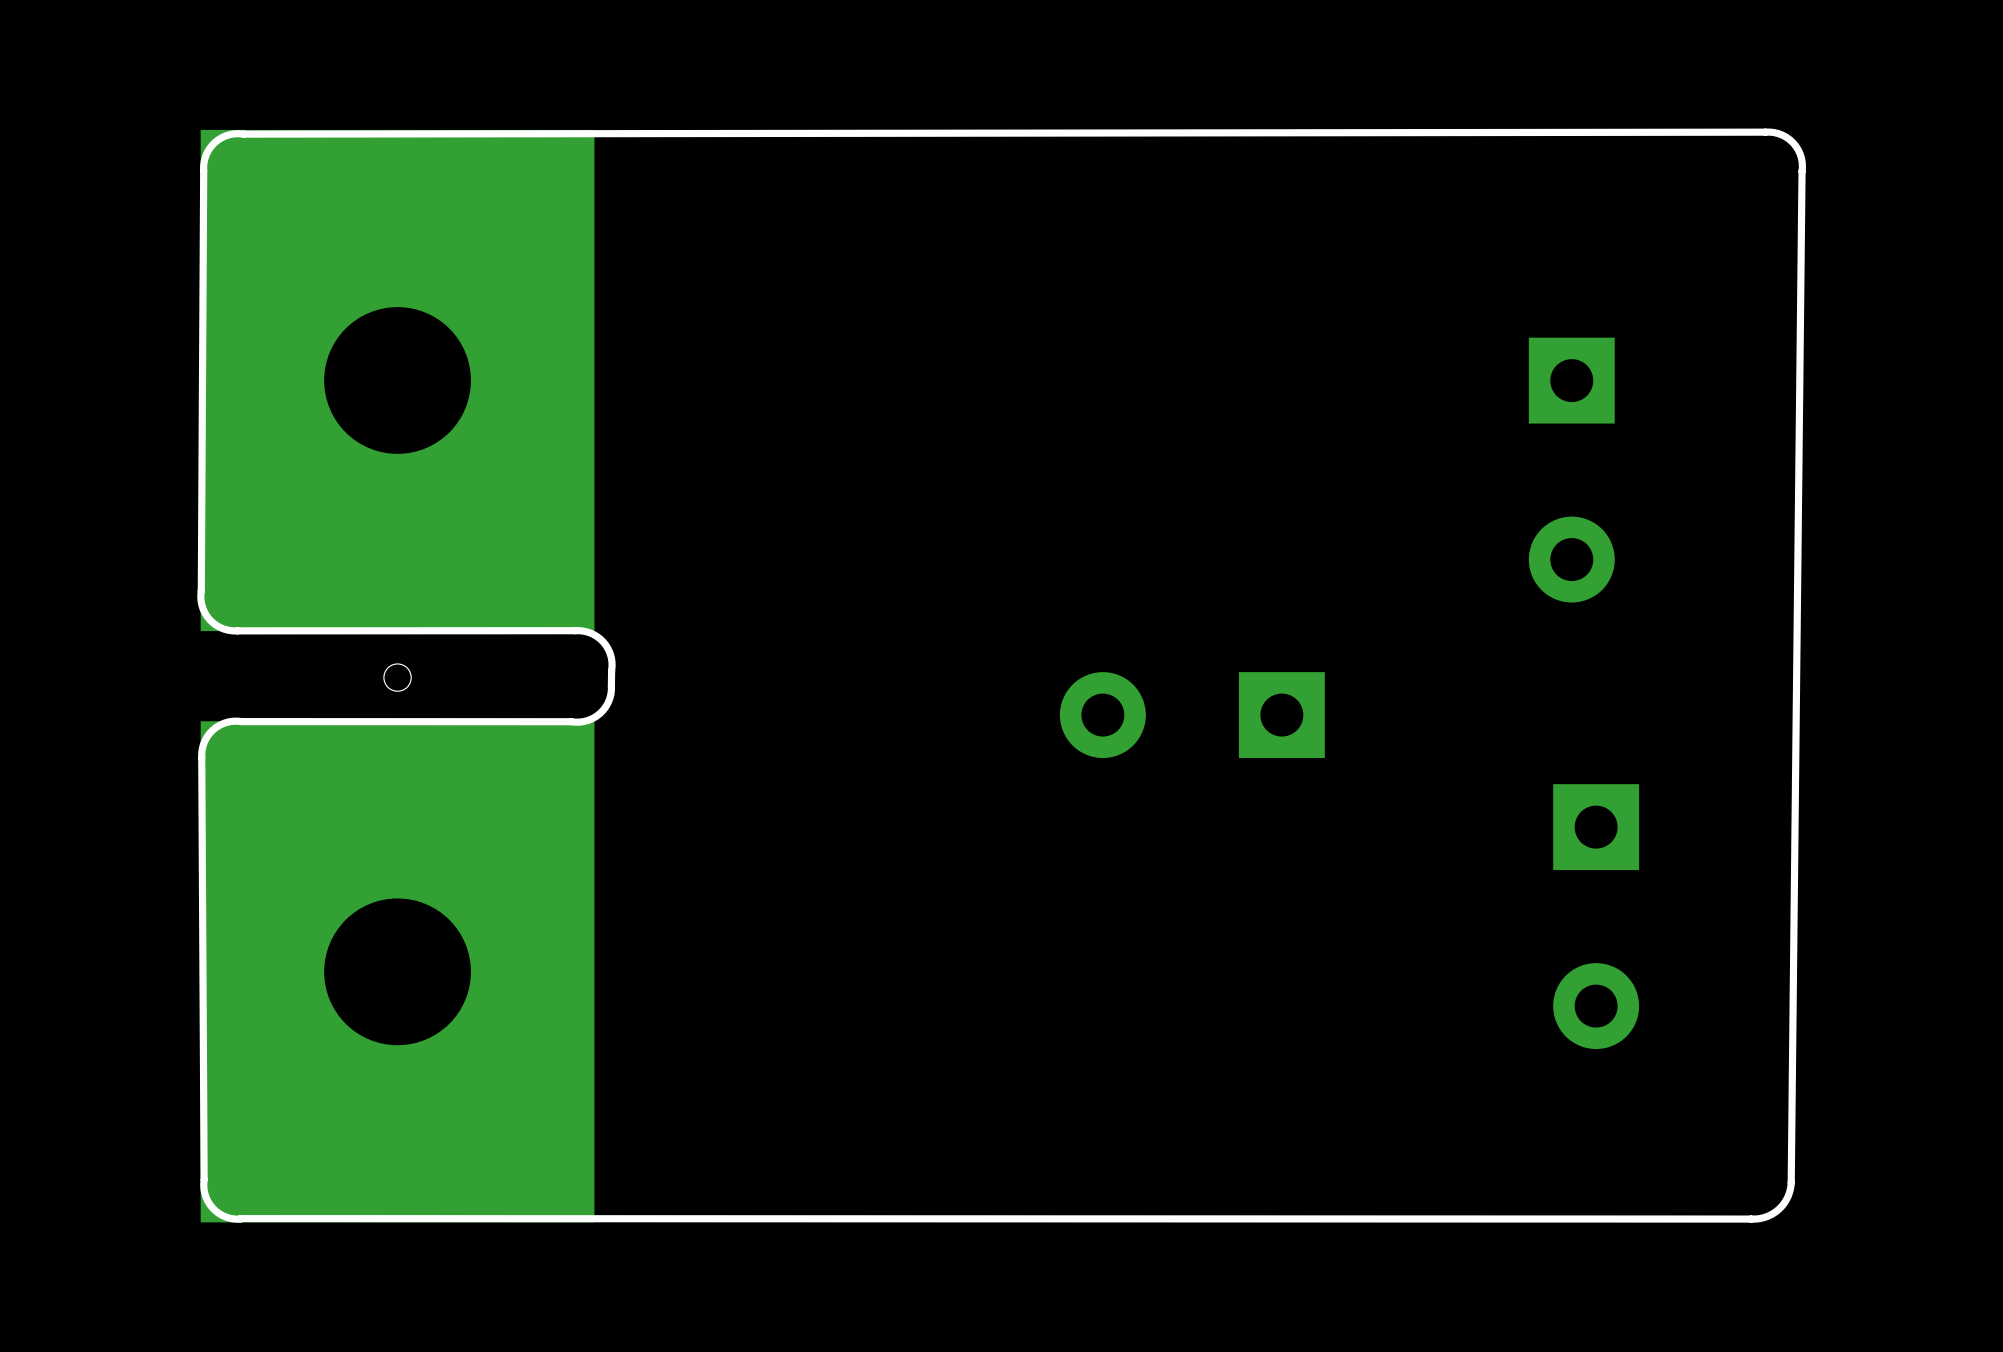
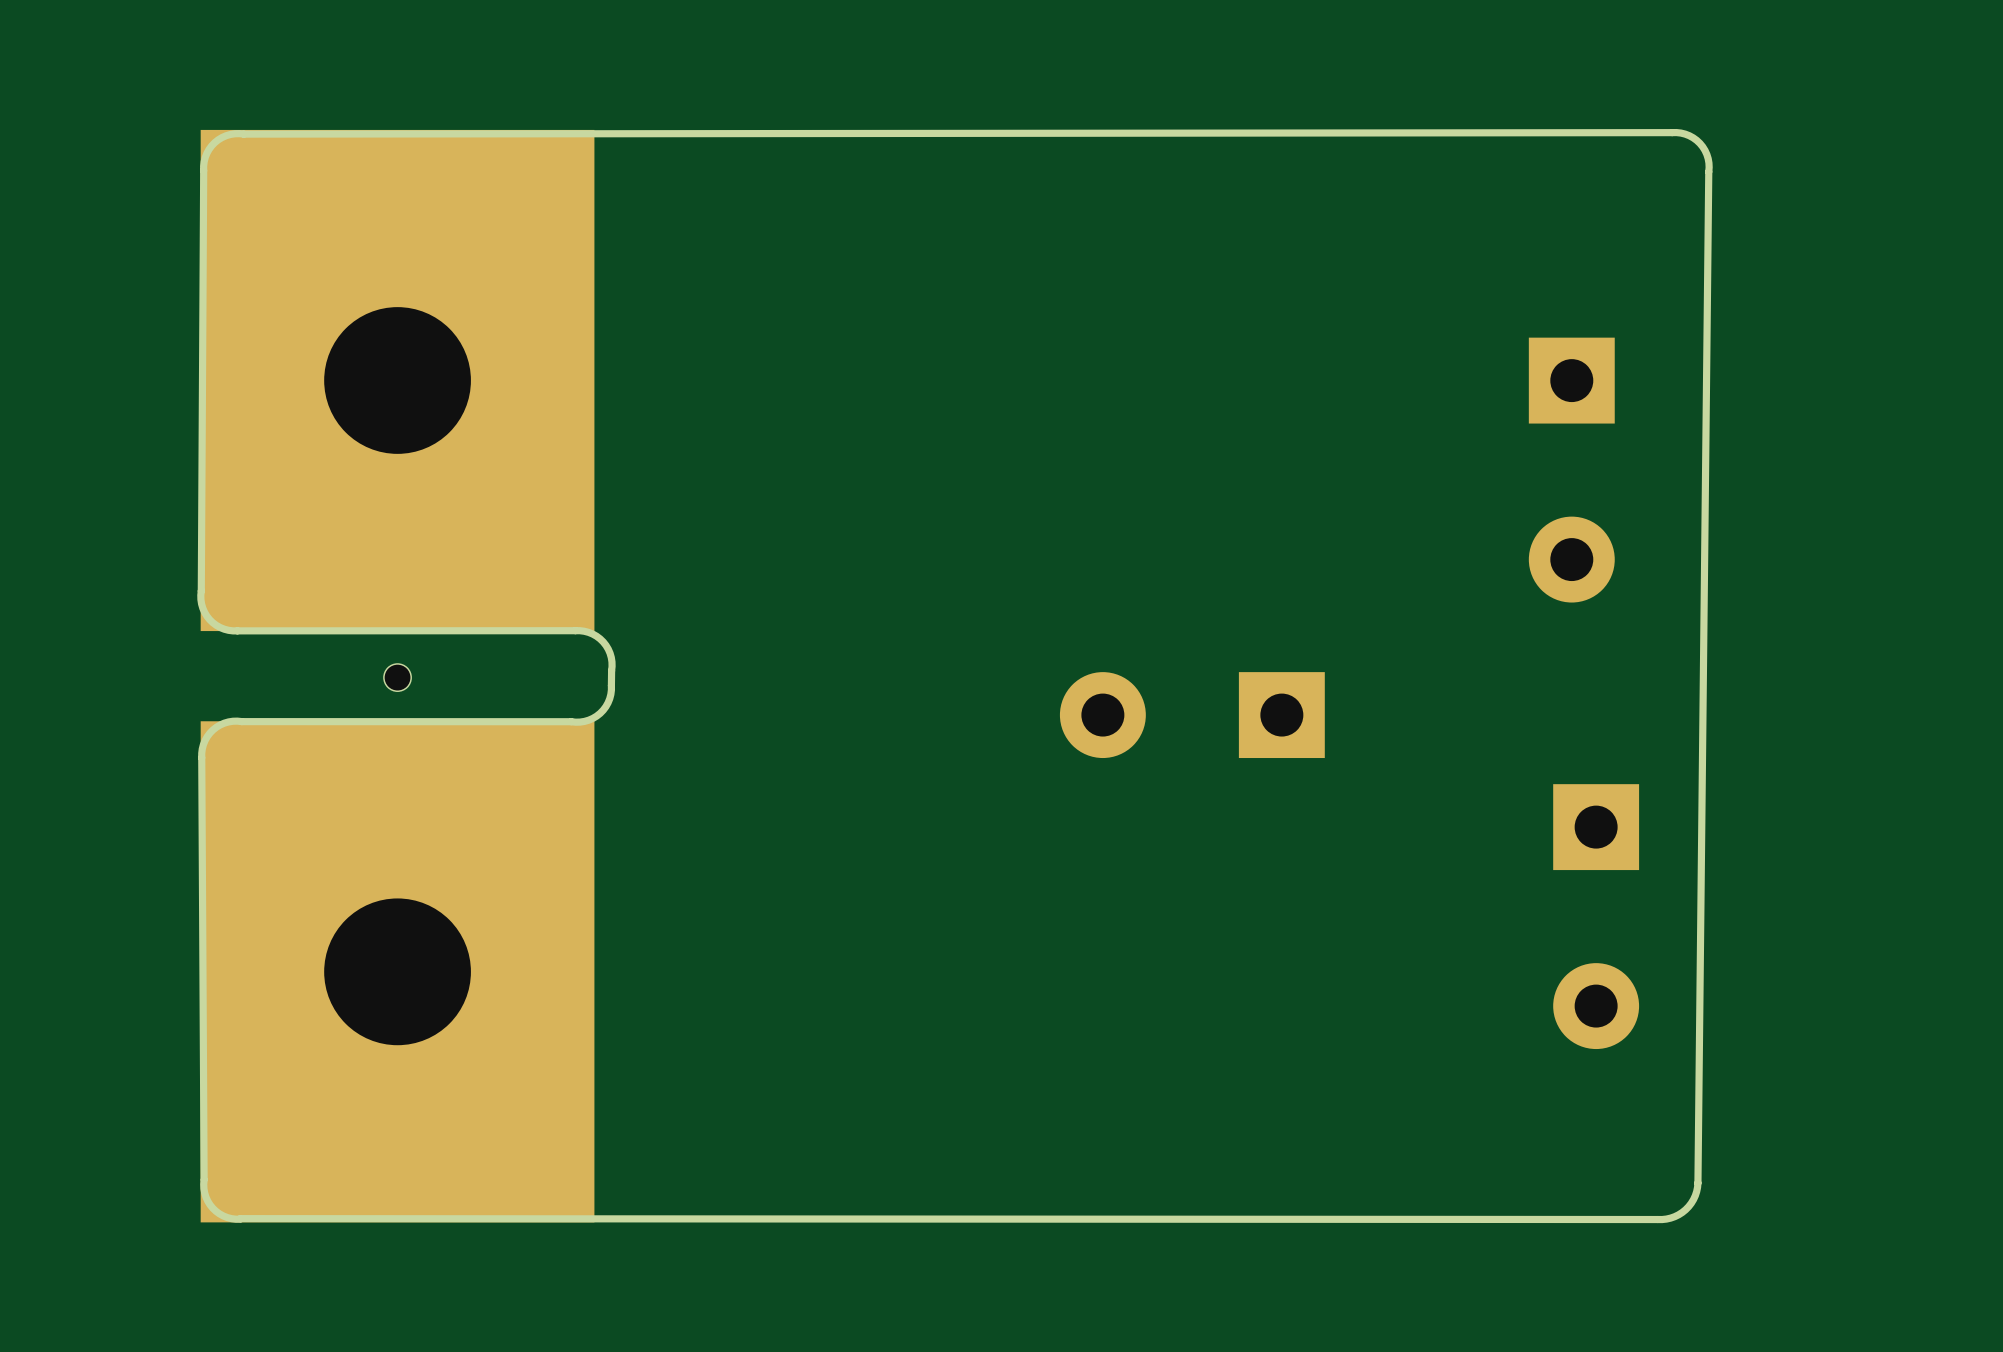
board edge: (243, 134) (1769, 132) (1782, 135) (1793, 142) (1800, 154) (1802, 166) (1791, 1182) (1786, 1199) (1775, 1212) (1755, 1219) (240, 1218) -> (243, 134) (1676, 132) (1689, 135) (1699, 143) (1706, 154) (1709, 167) (1697, 1183) (1693, 1199) (1682, 1212) (1662, 1219) (240, 1218)

